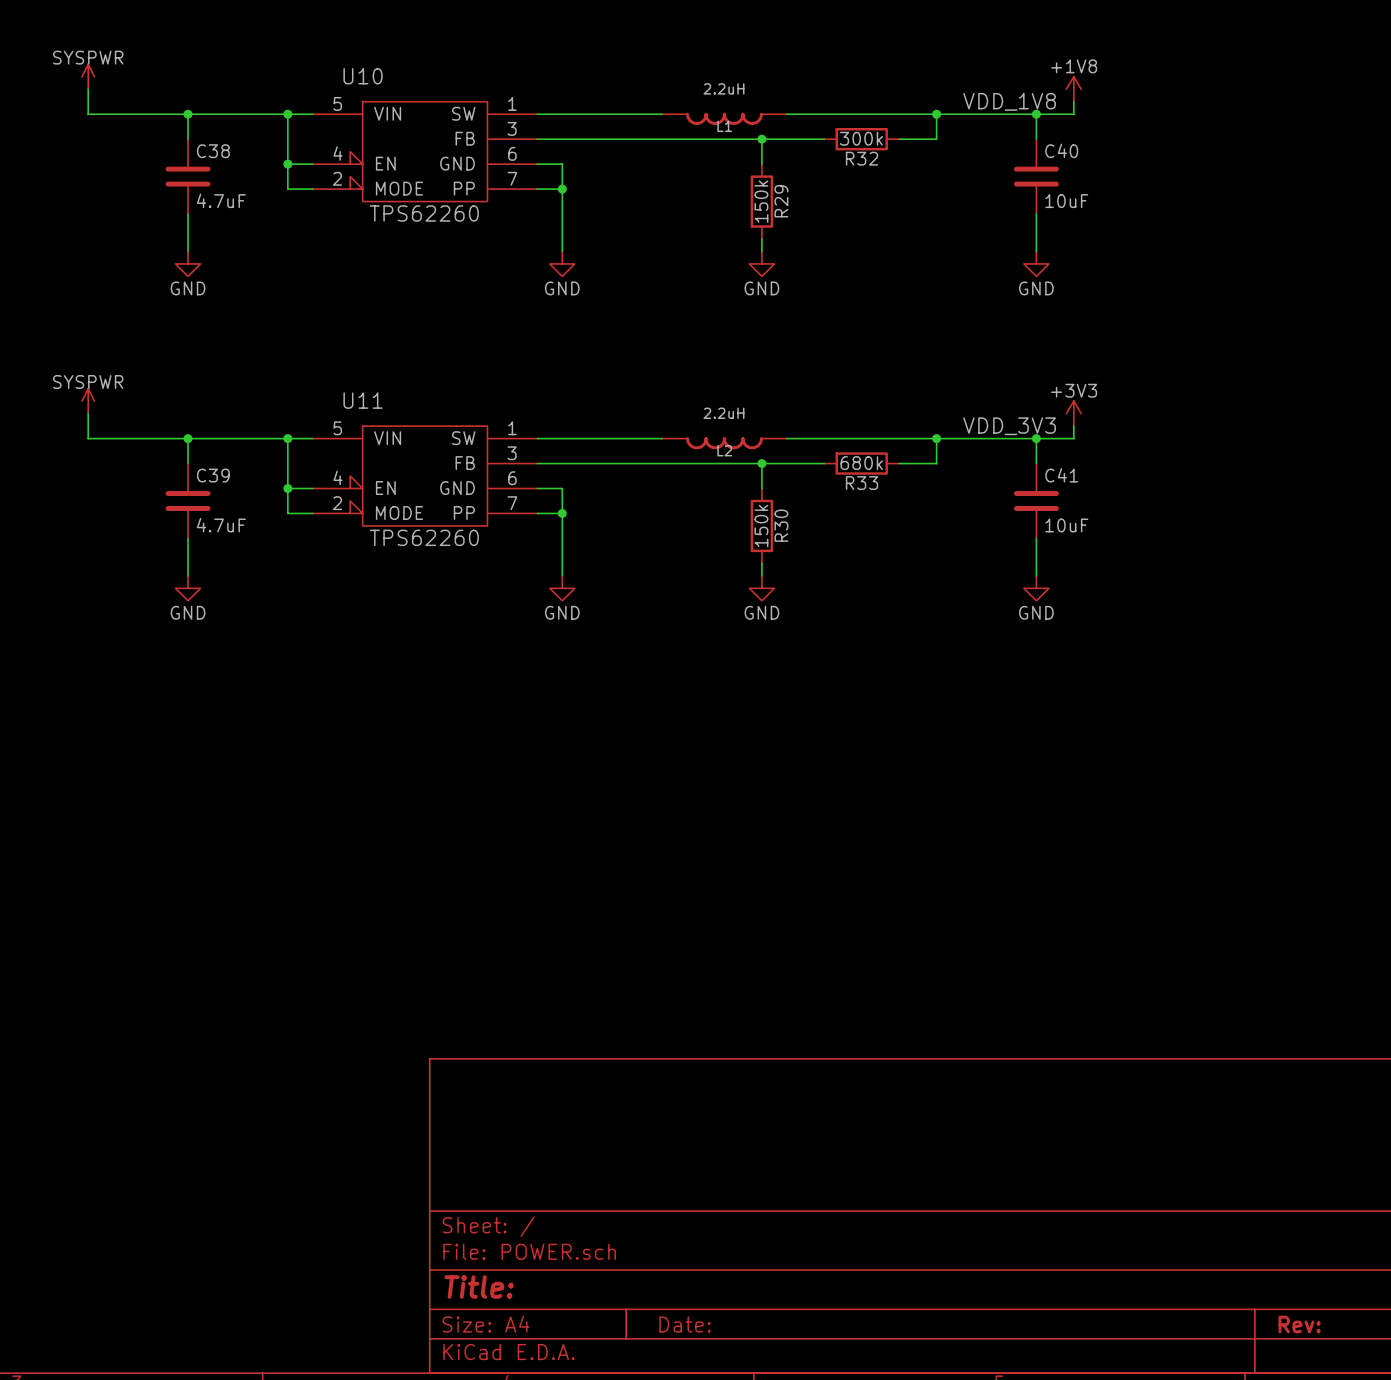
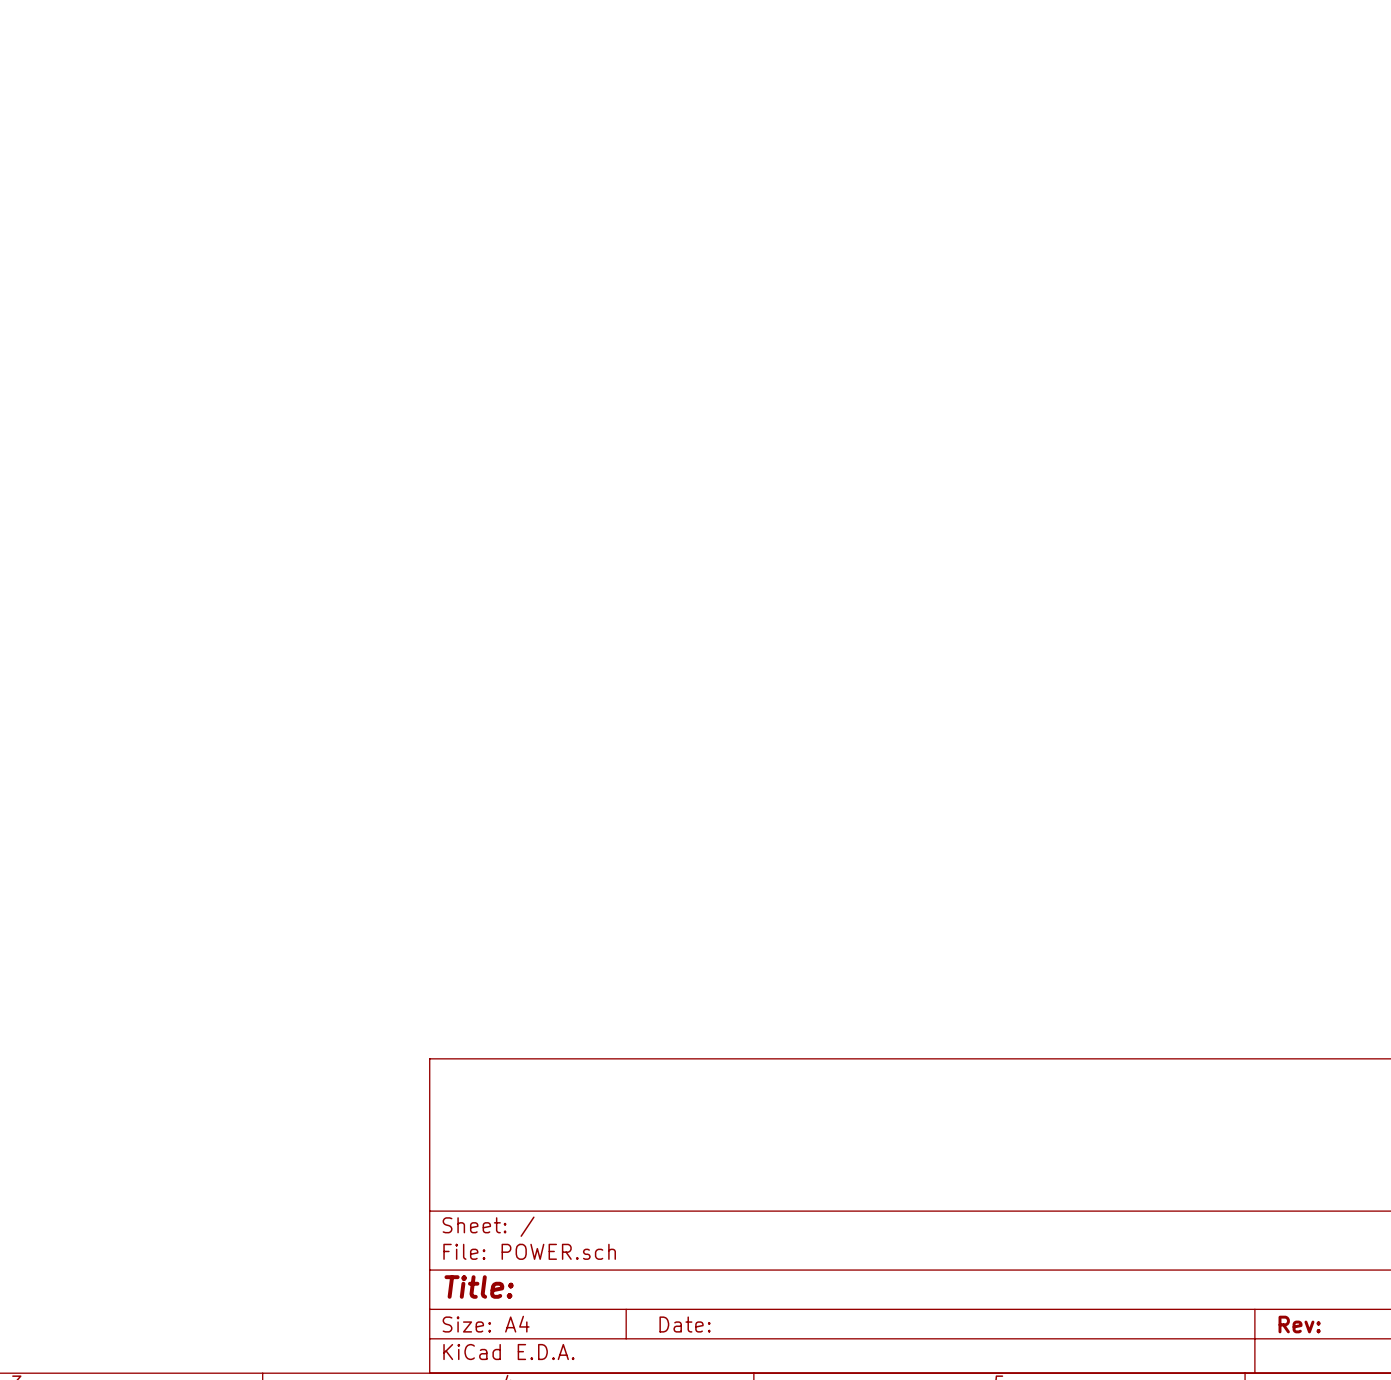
power symbol: SYSPWR (88, 76) -> none
wire: (88, 89) (88, 114) (312, 114) -> none
power symbol: +1V8 (1073, 89) -> none
label: VDD_1V8 (1009, 101) -> none
wire: (1073, 101) (1073, 114) (786, 114) -> none
wire: (188, 114) (188, 139) -> none
junction: (188, 114) -> none
wire: (287, 114) (287, 189) (312, 189) -> none
junction: (287, 114) -> none
wire: (537, 114) (662, 114) -> none
wire: (936, 114) (936, 139) (899, 139) -> none
junction: (936, 114) -> none
wire: (1036, 114) (1036, 139) -> none
junction: (1036, 114) -> none
L1: 2.2uH (724, 118) -> none
wire: (537, 139) (824, 139) -> none
wire: (761, 139) (761, 164) -> none
junction: (761, 139) -> none
R32: 300k (861, 139) -> none
U10: TPS62260 (425, 151) -> none
wire: (287, 164) (312, 164) -> none
junction: (287, 164) -> none
wire: (537, 164) (562, 164) (562, 251) -> none
C38: 4.7uF (188, 176) -> none
C40: 10uF (1036, 176) -> none
wire: (537, 189) (562, 189) -> none
junction: (562, 189) -> none
R29: 150k (761, 201) -> none
wire: (188, 214) (188, 251) -> none
wire: (1036, 214) (1036, 251) -> none
wire: (761, 238) (761, 251) -> none
power symbol: GND (188, 263) -> none
power symbol: GND (562, 263) -> none
power symbol: GND (761, 263) -> none
power symbol: GND (1036, 263) -> none
power symbol: SYSPWR (88, 401) -> none
wire: (88, 413) (88, 438) (312, 438) -> none
power symbol: +3V3 (1073, 413) -> none
label: VDD_3V3 (1009, 426) -> none
wire: (1073, 426) (1073, 438) (786, 438) -> none
wire: (188, 438) (188, 463) -> none
junction: (188, 438) -> none
wire: (287, 438) (287, 513) (312, 513) -> none
junction: (287, 438) -> none
wire: (537, 438) (662, 438) -> none
wire: (936, 438) (936, 463) (899, 463) -> none
junction: (936, 438) -> none
wire: (1036, 438) (1036, 463) -> none
junction: (1036, 438) -> none
L2: 2.2uH (724, 443) -> none
wire: (537, 463) (824, 463) -> none
wire: (761, 463) (761, 488) -> none
junction: (761, 463) -> none
R33: 680k (861, 463) -> none
U11: TPS62260 (425, 476) -> none
wire: (287, 488) (312, 488) -> none
junction: (287, 488) -> none
wire: (537, 488) (562, 488) (562, 575) -> none
C39: 4.7uF (188, 500) -> none
C41: 10uF (1036, 500) -> none
wire: (537, 513) (562, 513) -> none
junction: (562, 513) -> none
R30: 150k (761, 525) -> none
wire: (188, 538) (188, 575) -> none
wire: (1036, 538) (1036, 575) -> none
wire: (761, 563) (761, 575) -> none
power symbol: GND (188, 588) -> none
power symbol: GND (562, 588) -> none
power symbol: GND (761, 588) -> none
power symbol: GND (1036, 588) -> none

